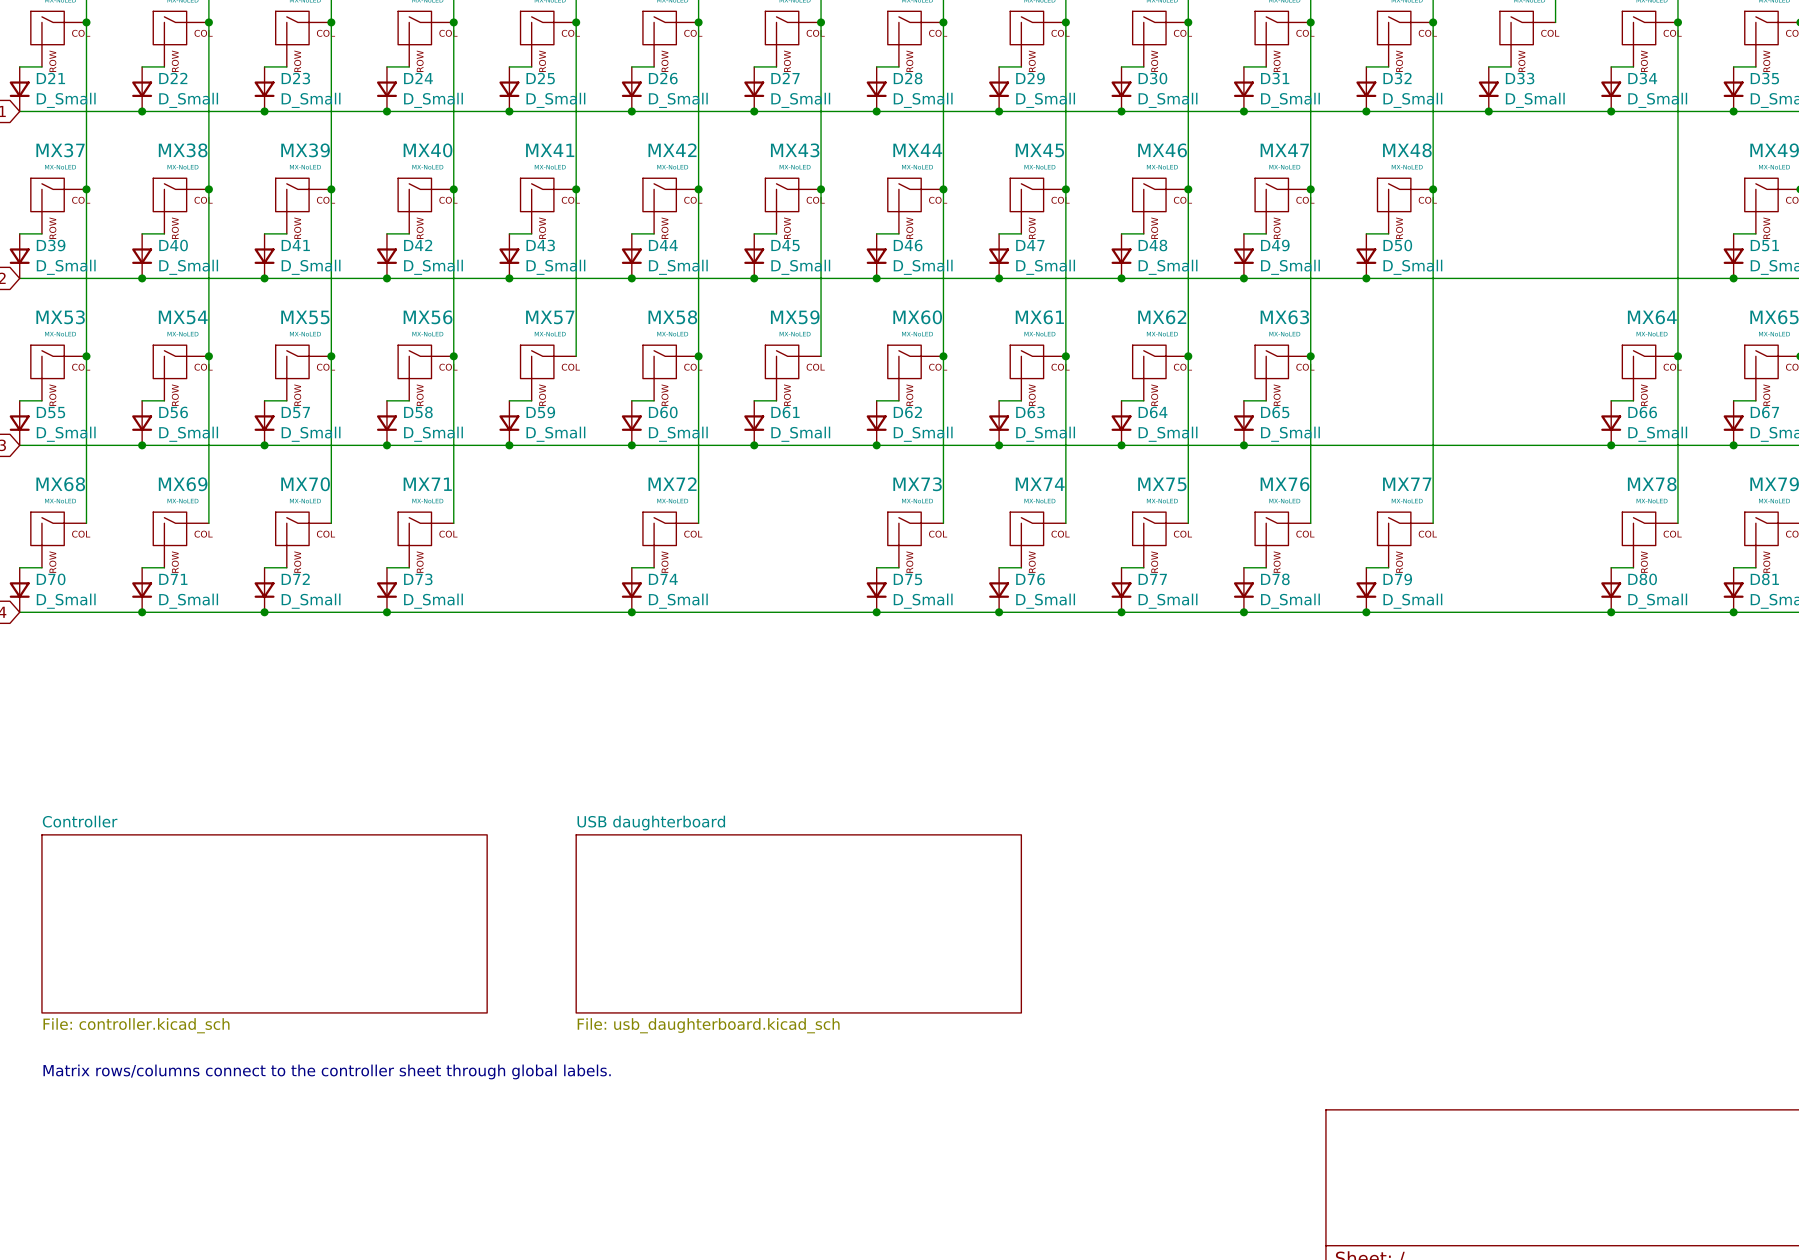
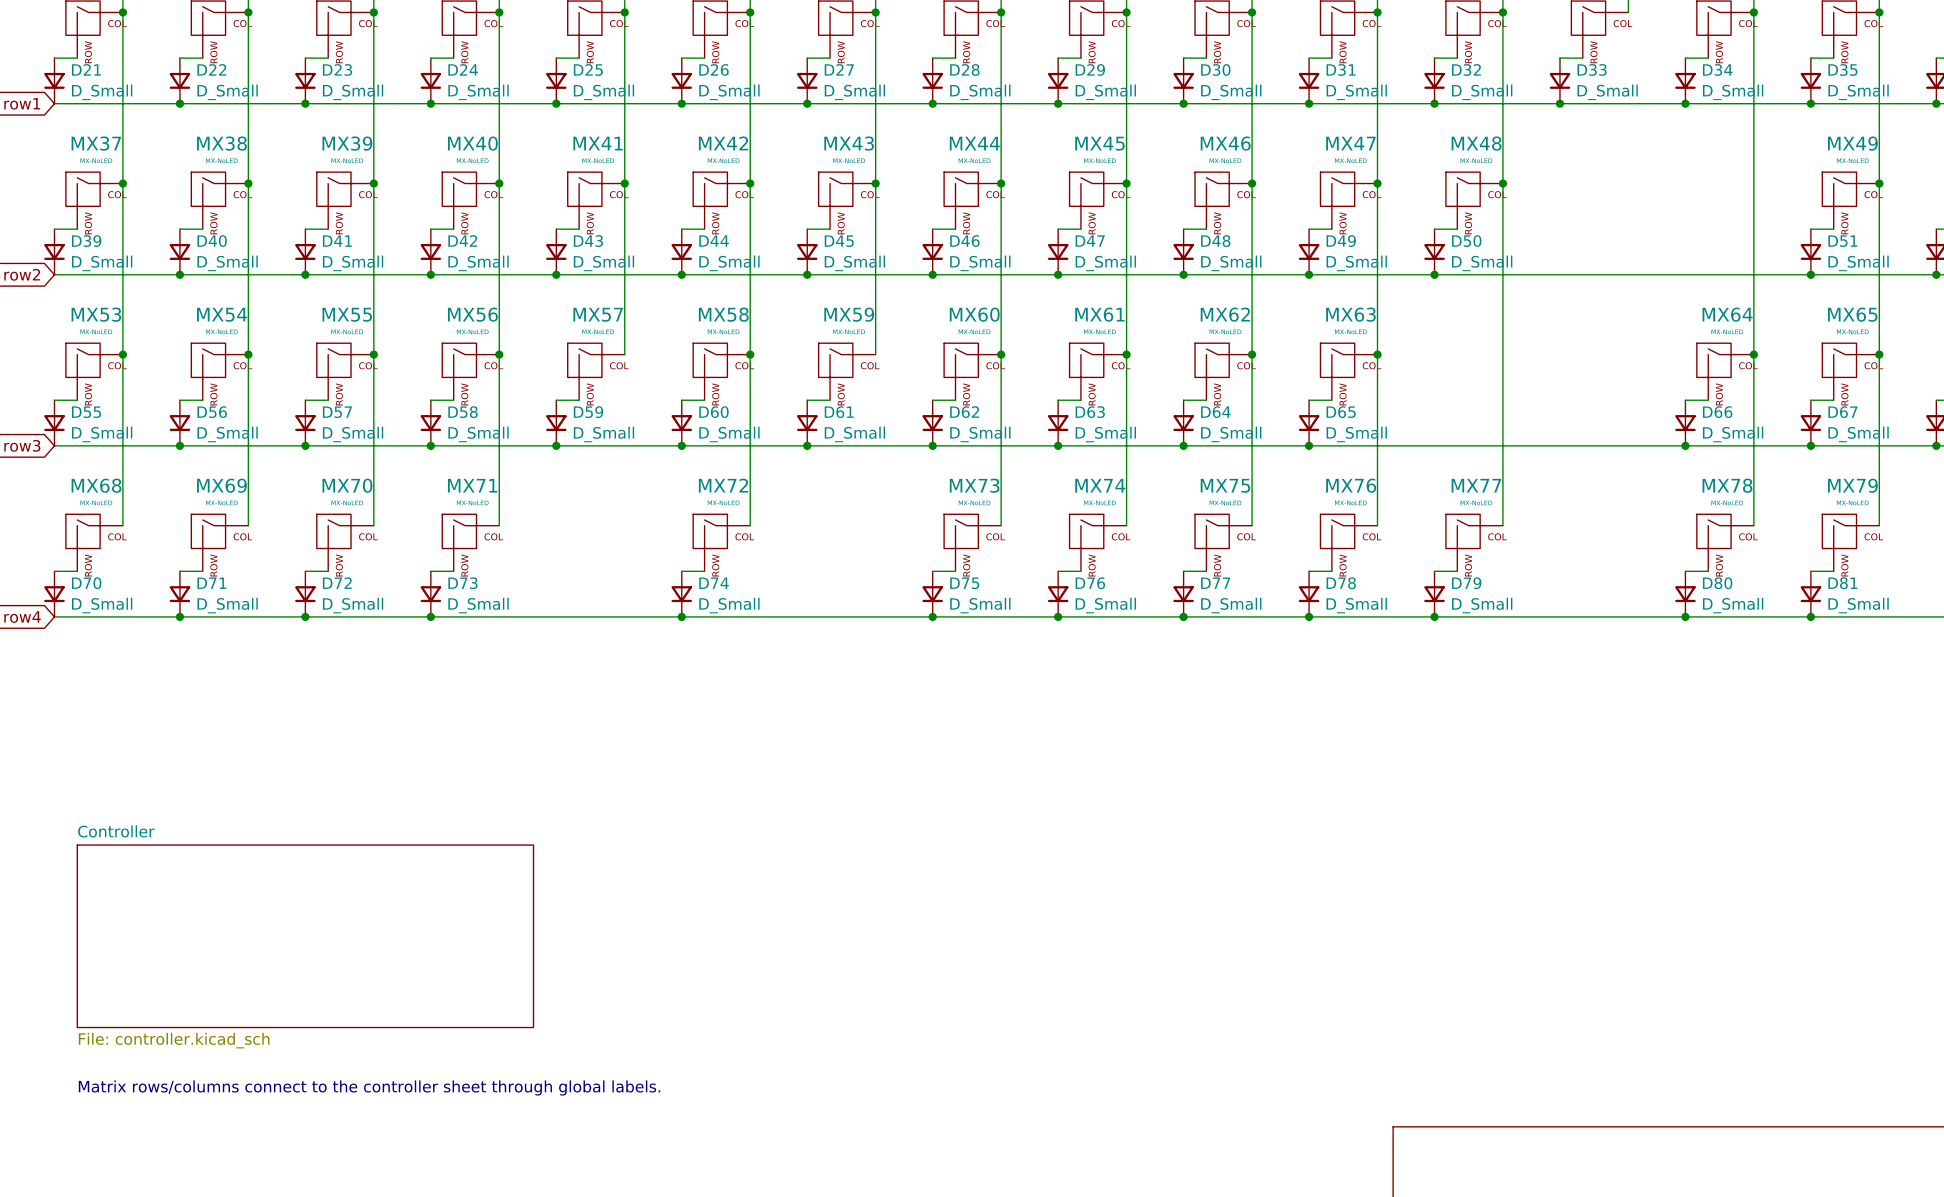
sheet USB daughterboard: File: usb_daughterboard.kicad_sch (798, 923) -> none

